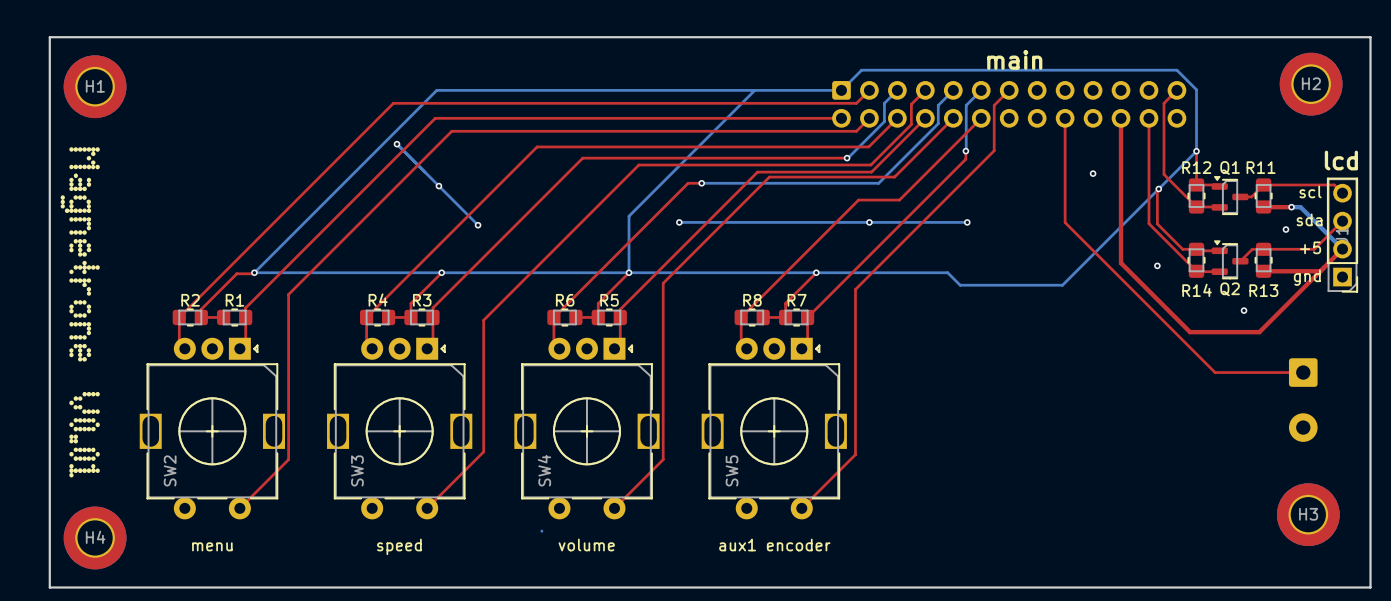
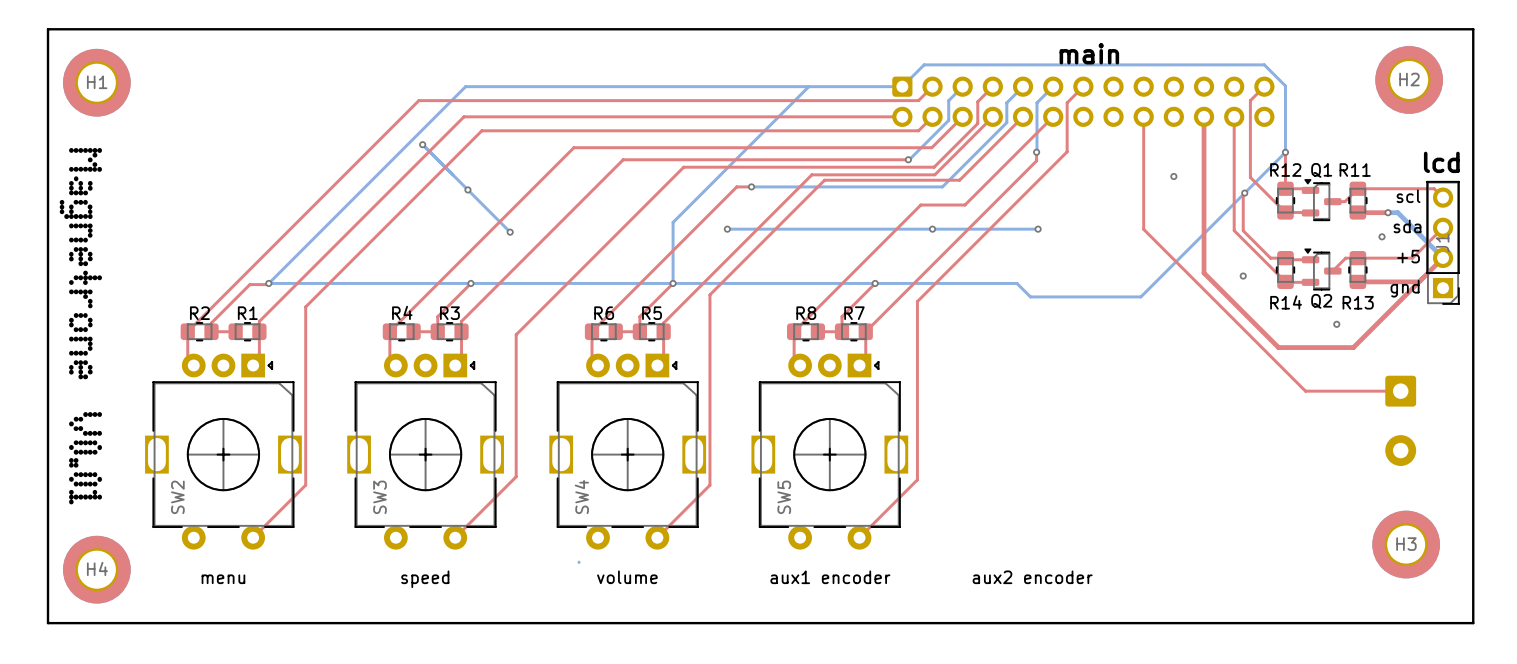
text: none -> aux2 encoder (1032, 577)

